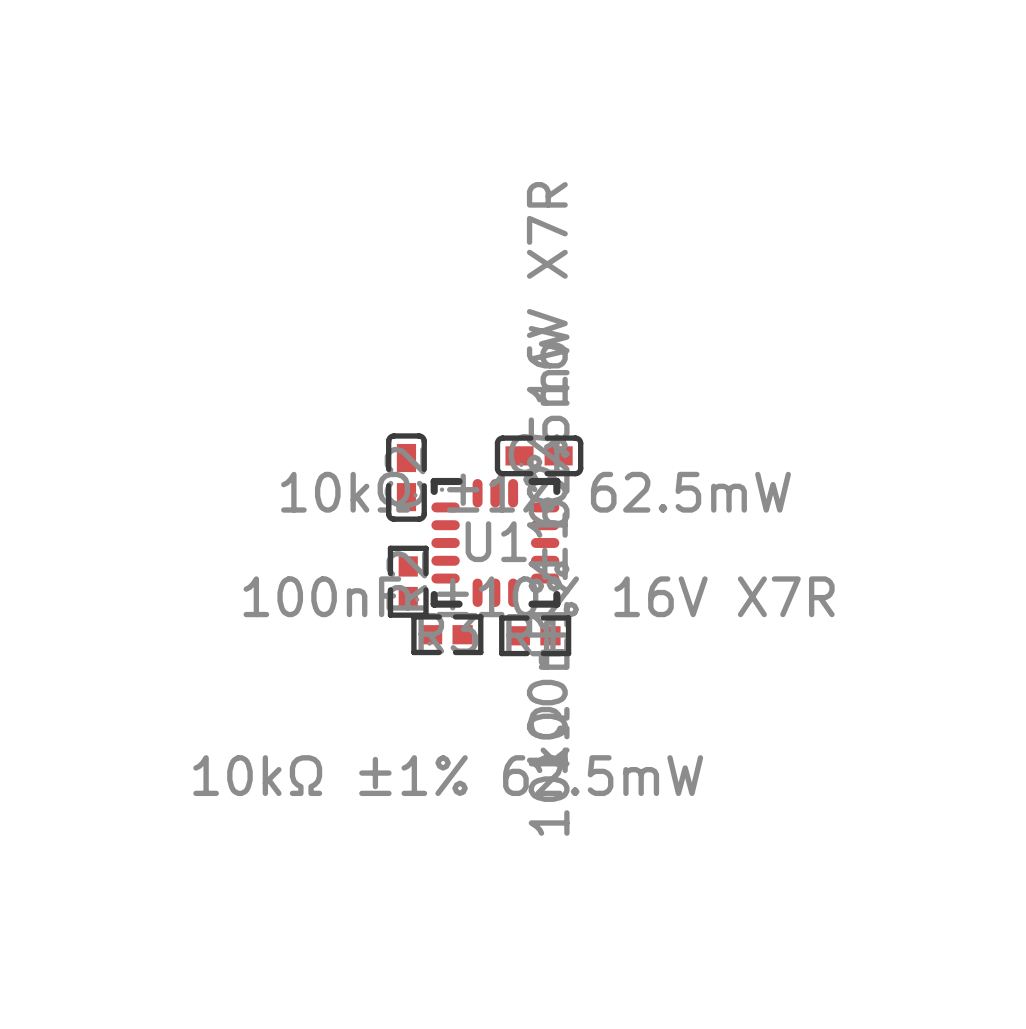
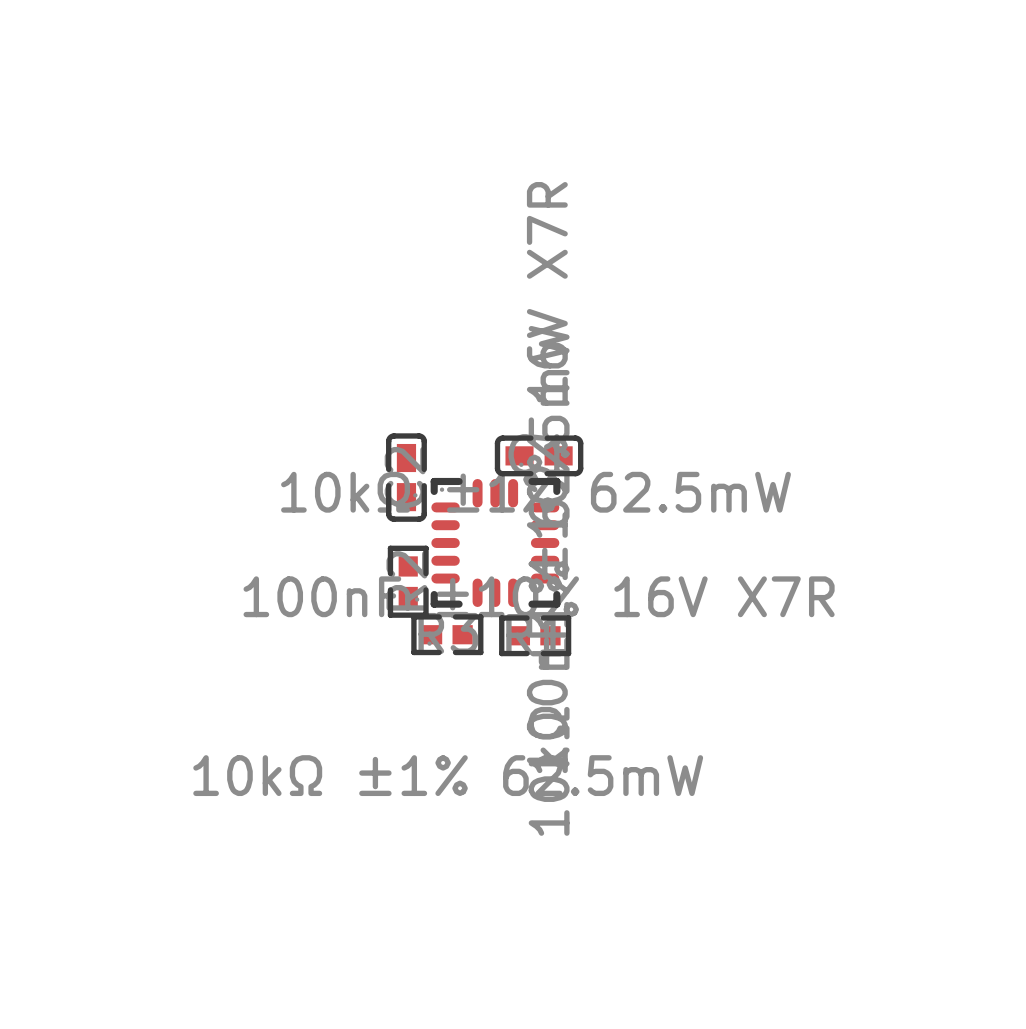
U1 name: U1 (496, 541) -> none

